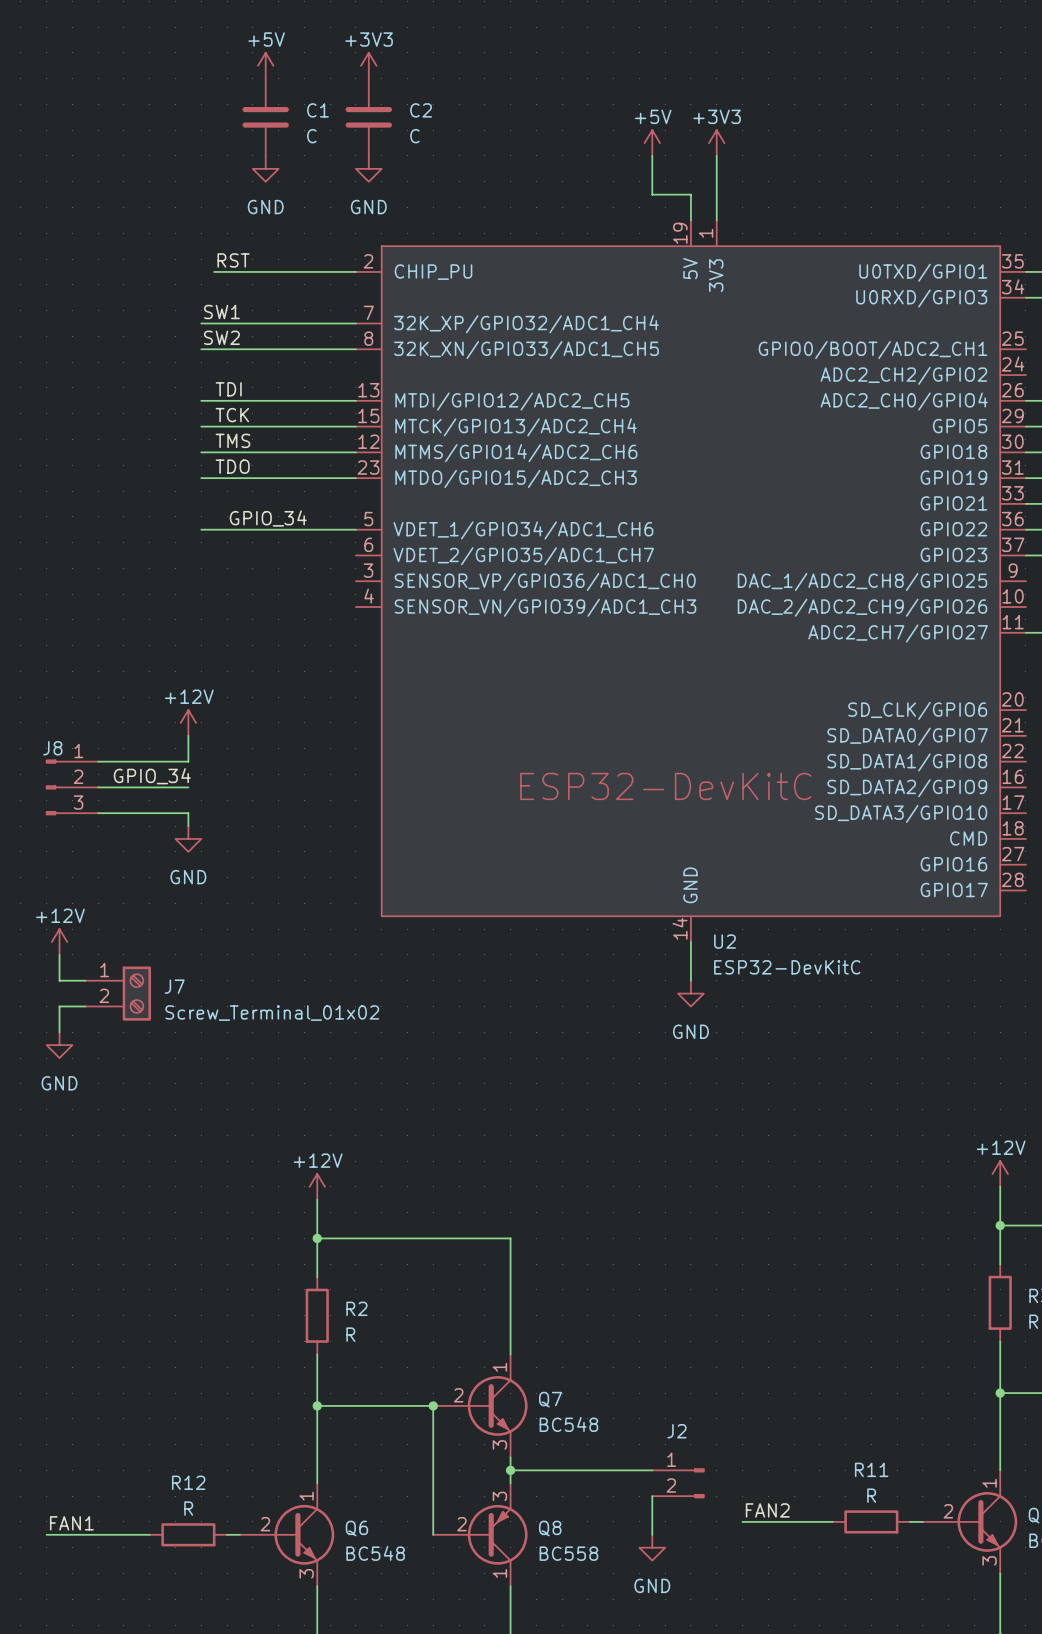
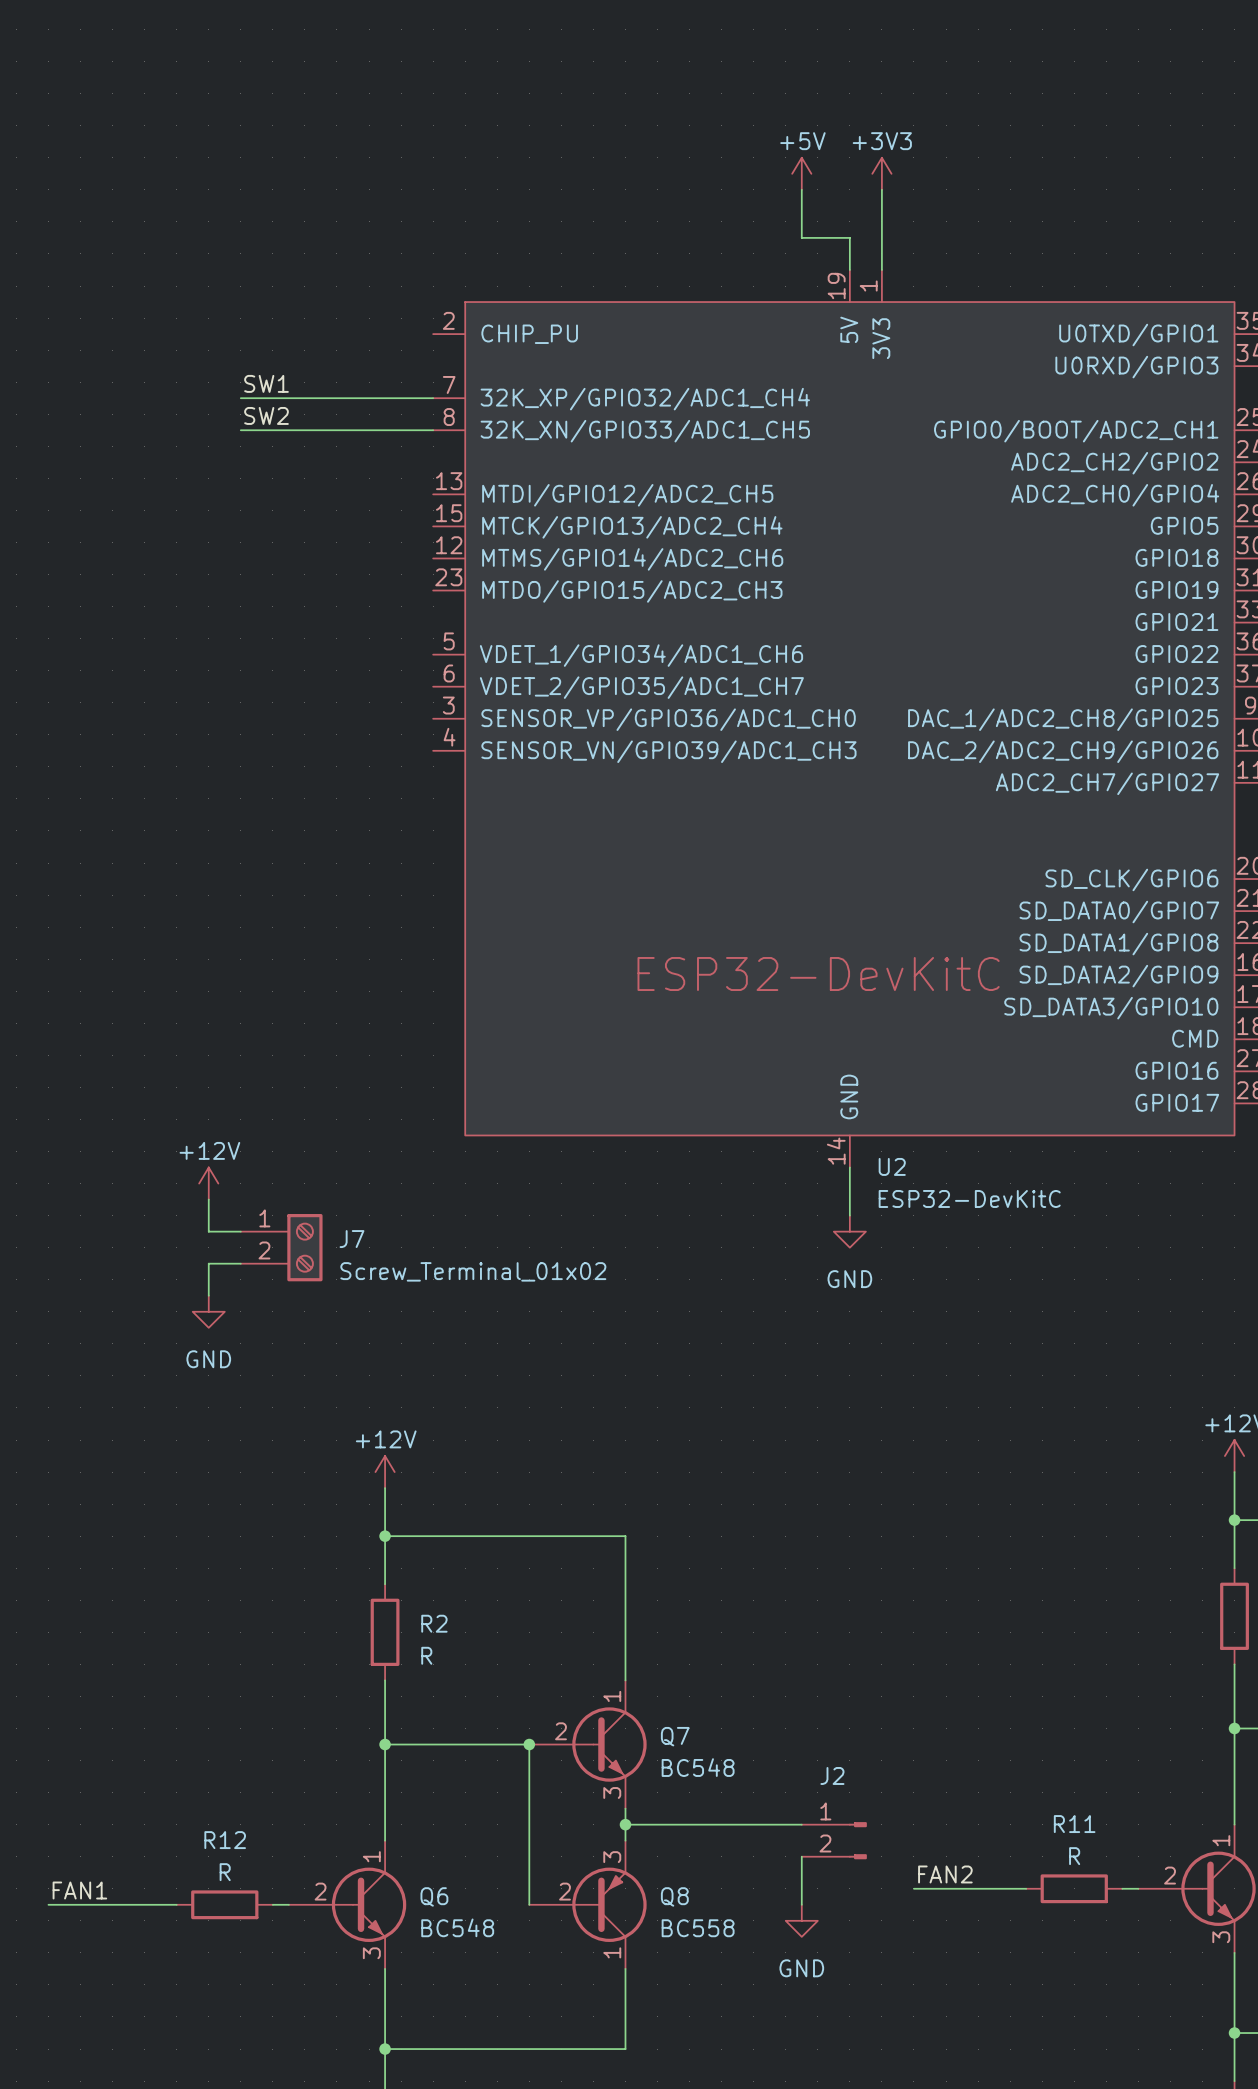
power symbol: +5V (265, 65) -> none
power symbol: +3V3 (368, 65) -> none
C1: C (265, 117) -> none
C2: C (368, 117) -> none
power symbol: GND (265, 168) -> none
power symbol: GND (368, 168) -> none
label: RST (233, 260) -> none
wire: (214, 271) (355, 271) -> none
label: TDI (228, 389) -> none
wire: (201, 400) (355, 400) -> none
label: TCK (232, 415) -> none
wire: (201, 426) (355, 426) -> none
label: TMS (232, 440) -> none
wire: (201, 452) (355, 452) -> none
label: TDO (232, 466) -> none
wire: (201, 478) (355, 478) -> none
label: GPIO_34 (268, 518) -> none
wire: (201, 529) (355, 529) -> none
power symbol: +12V (188, 722) -> none
wire: (188, 735) (188, 761) (98, 761) -> none
label: GPIO_34 (152, 776) -> none
J8: (72, 787) -> none
wire: (98, 787) (188, 787) -> none
wire: (98, 813) (188, 813) (188, 826) -> none
power symbol: GND (188, 838) -> none
power symbol: +12V (59, 942) -> none
wire: (59, 954) (59, 980) (85, 980) -> (208, 1199) (208, 1231) (240, 1231)
power symbol: none -> +12V (208, 1183)
J7 position: (118, 993) -> (281, 1247)
wire: (85, 1006) (59, 1006) (59, 1032) -> (240, 1263) (208, 1263) (208, 1295)
power symbol: GND (59, 1045) -> none
power symbol: none -> GND (208, 1311)

